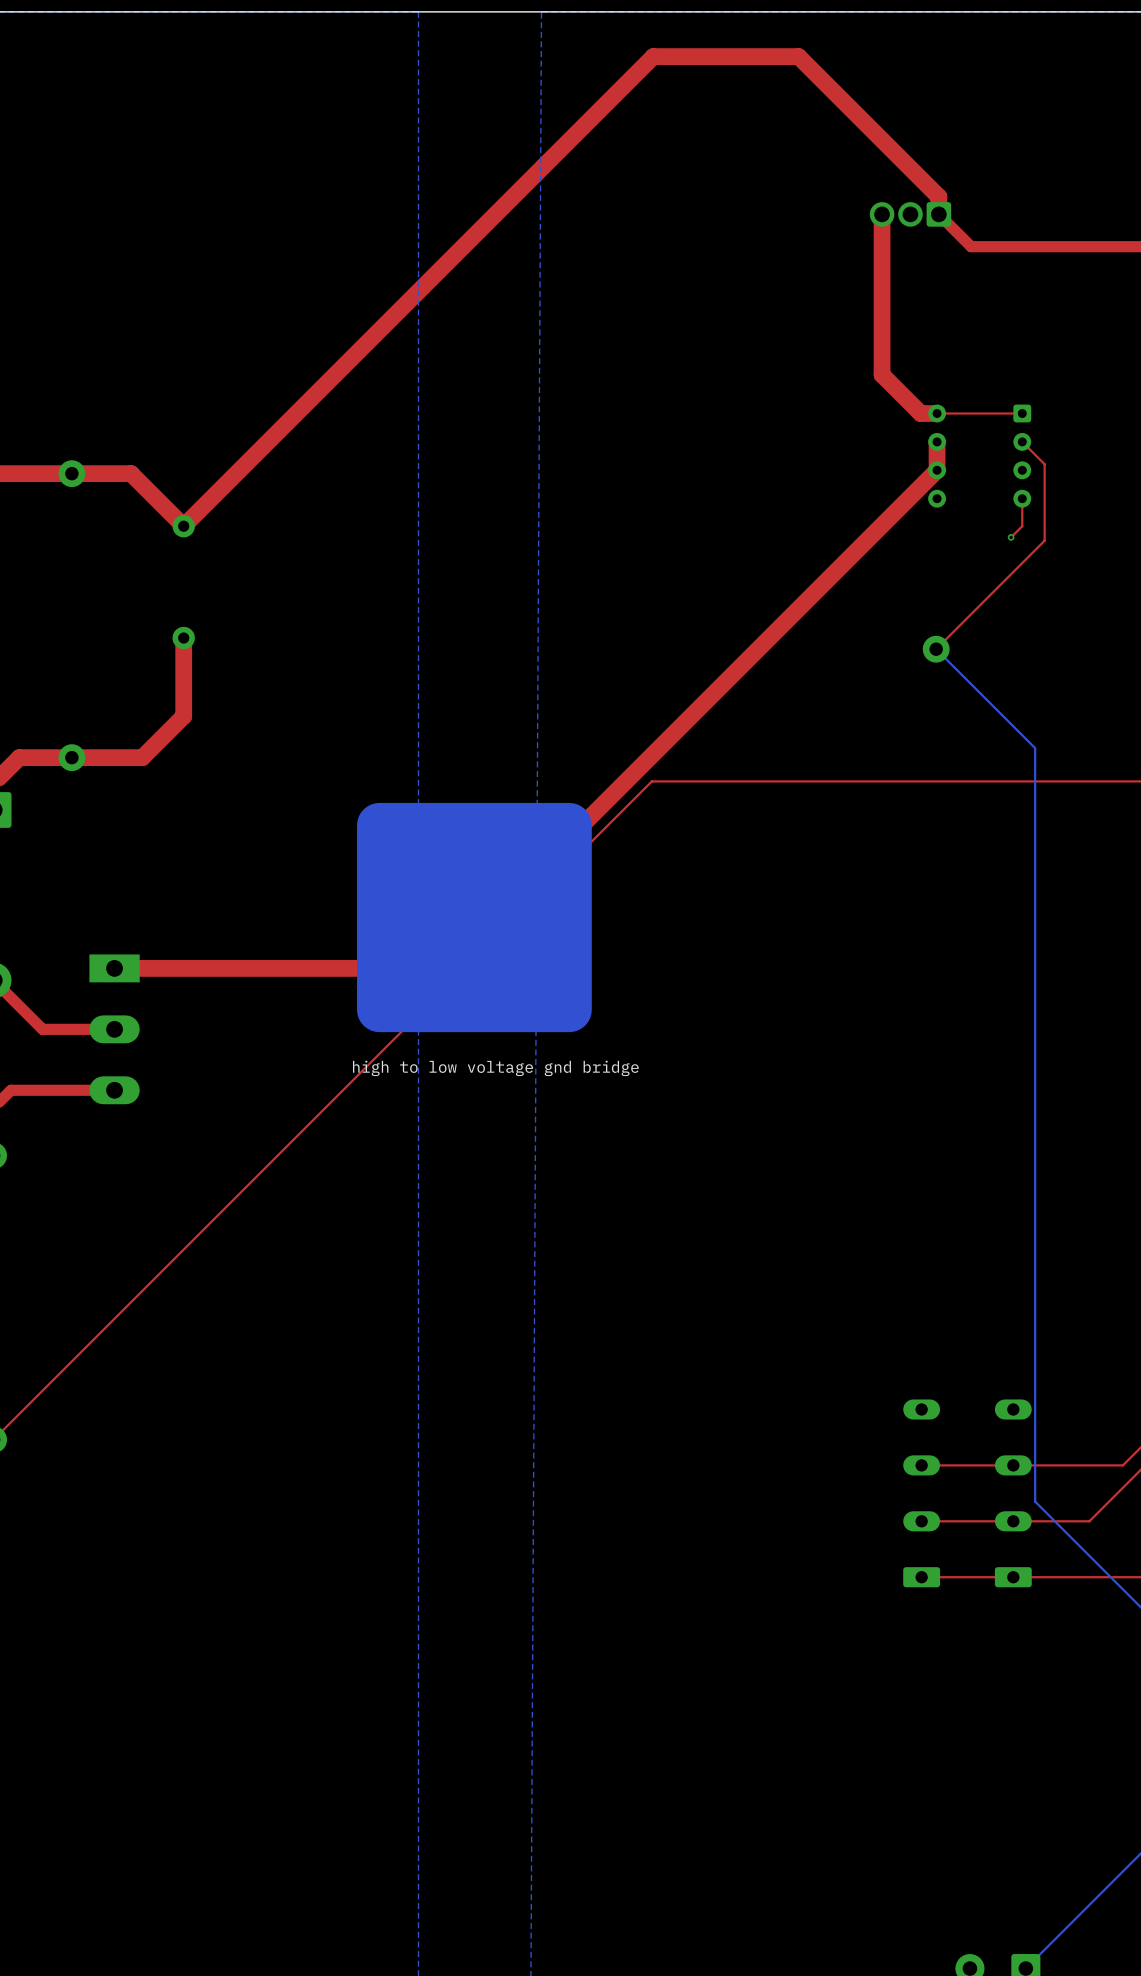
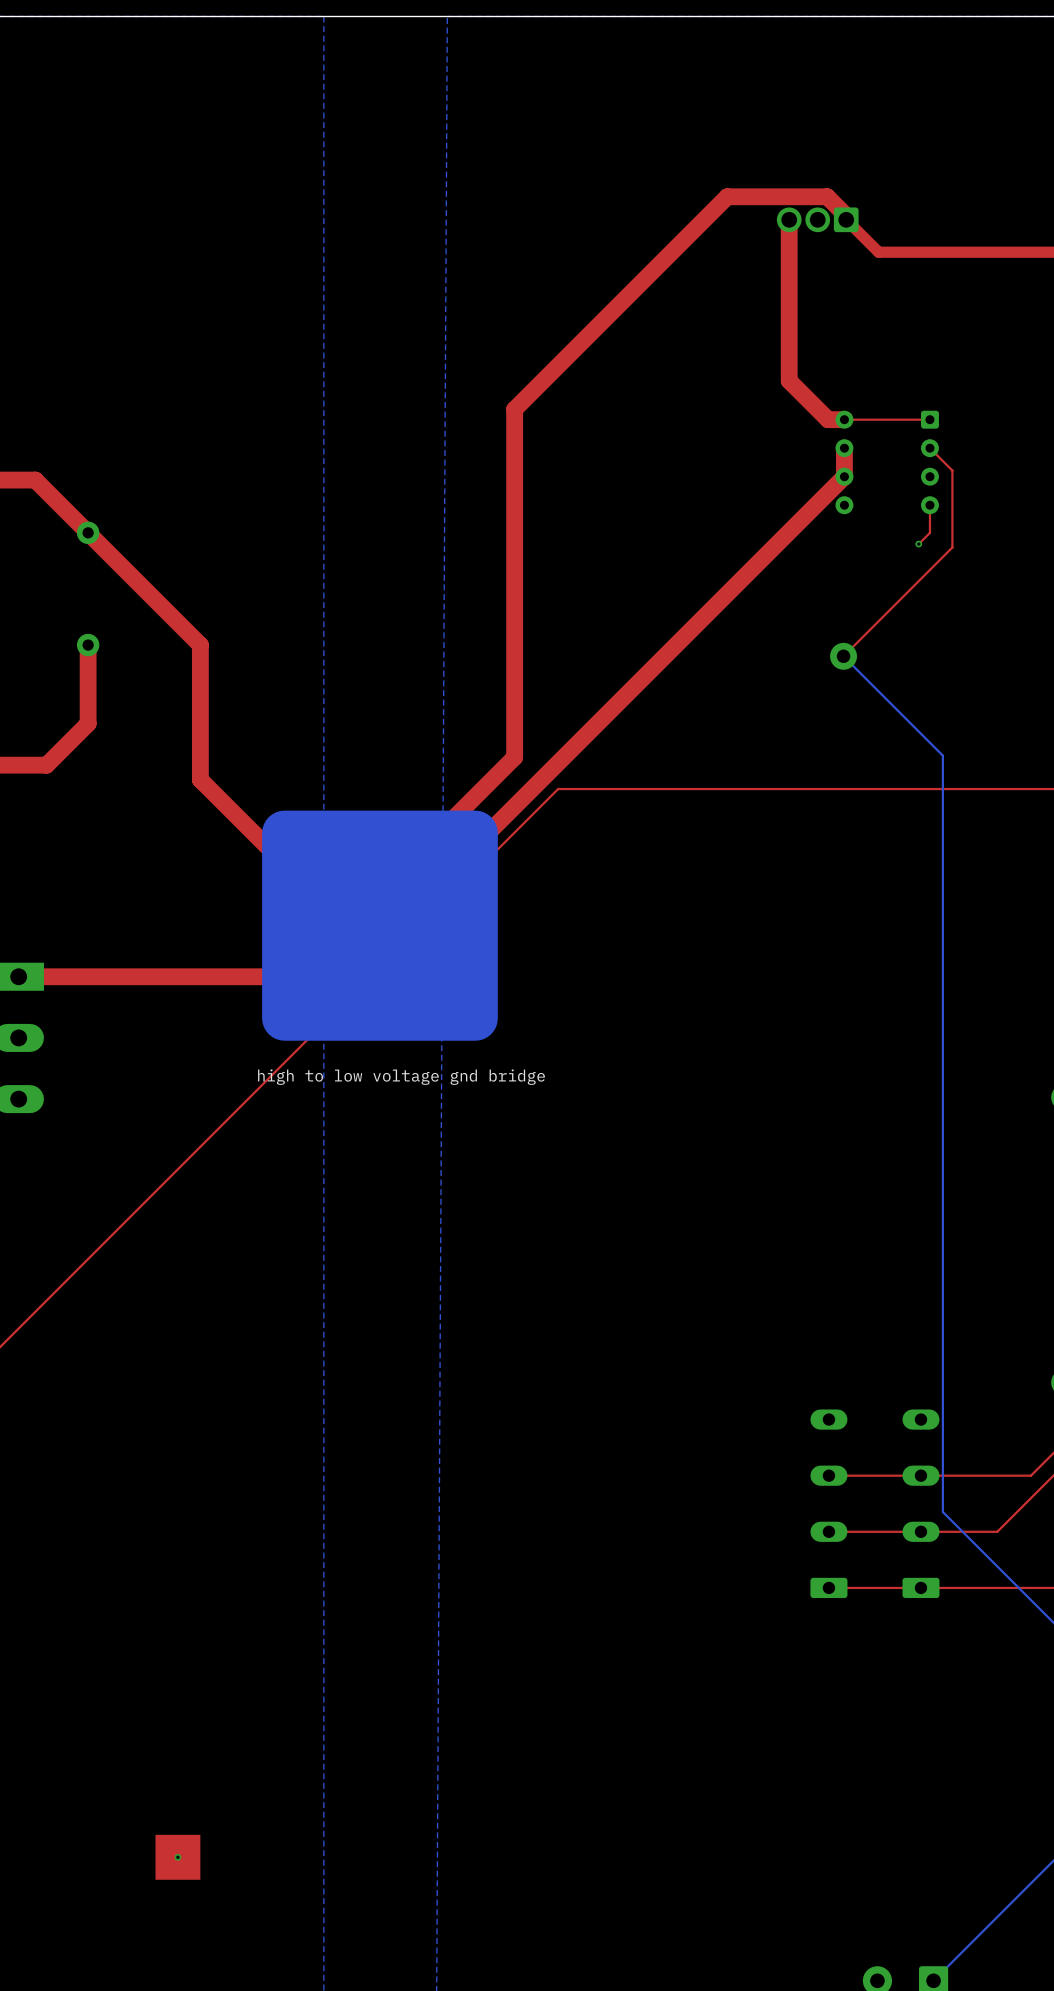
top track: (938, 210) (938, 196) (798, 56) (653, 56) (183, 526) -> (846, 215) (827, 196) (727, 196) (514, 409) (514, 757) (379, 892) (312, 892) (200, 779) (200, 645) (88, 532)
part: none -> (177, 1857)
via: none -> (177, 1857)

